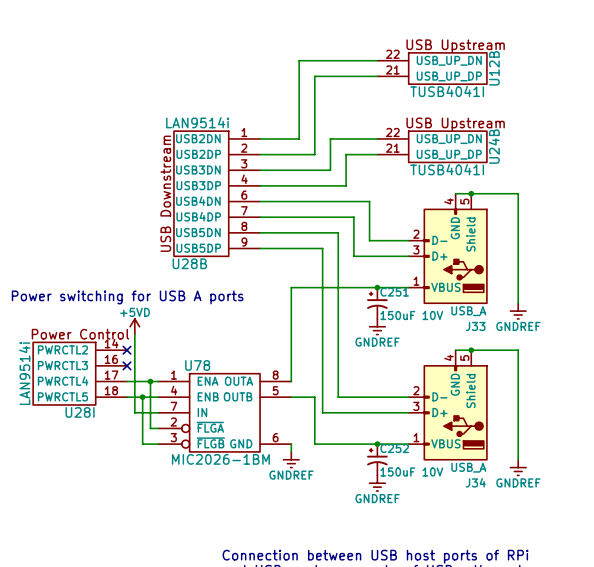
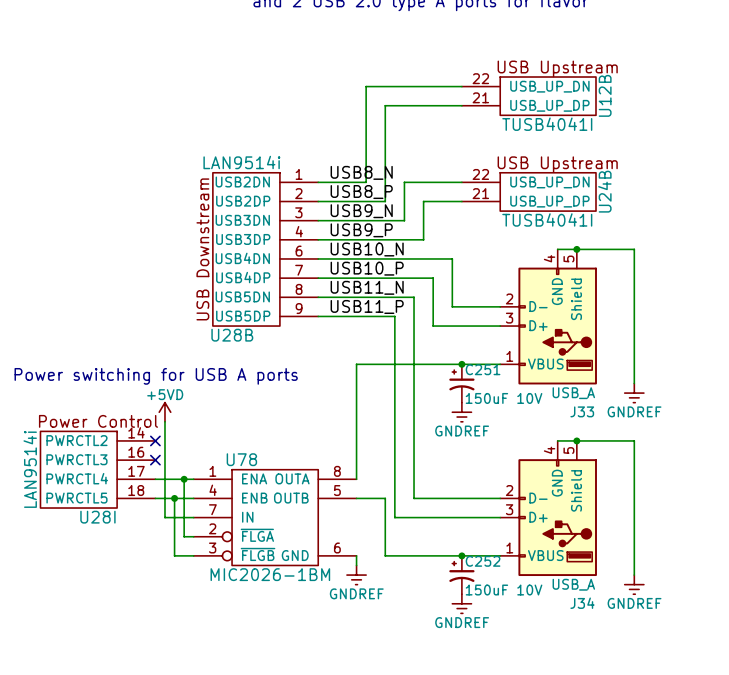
label: none -> USB8_N (361, 172)
label: none -> USB8_P (361, 192)
label: none -> USB9_N (361, 211)
label: none -> USB9_P (361, 230)
label: none -> USB10_N (367, 249)
label: none -> USB10_P (367, 268)
label: none -> USB11_N (367, 287)
label: none -> USB11_P (367, 306)

